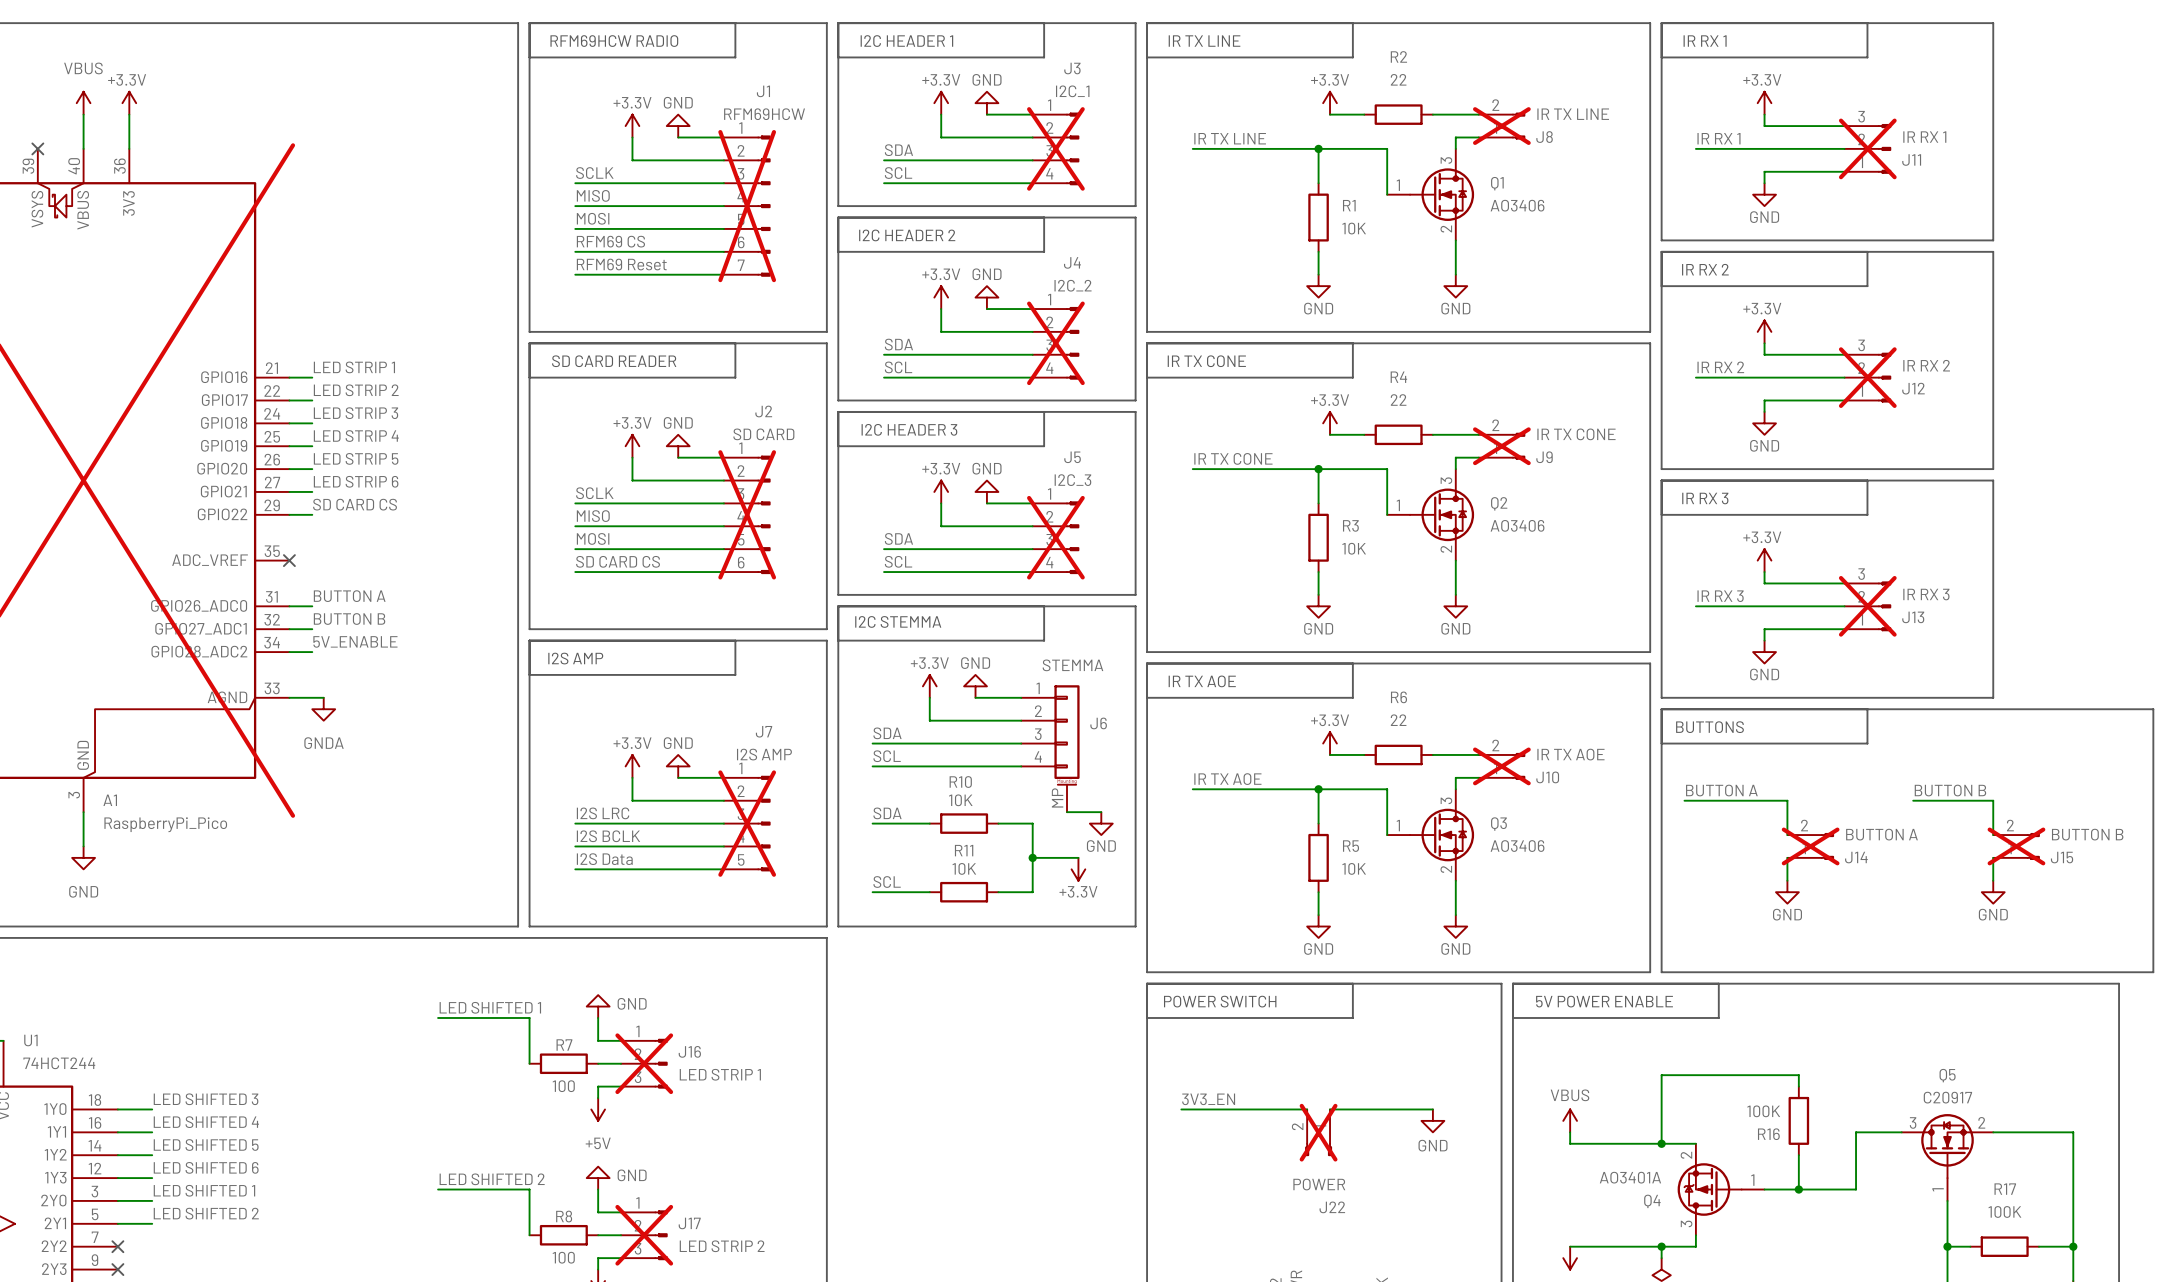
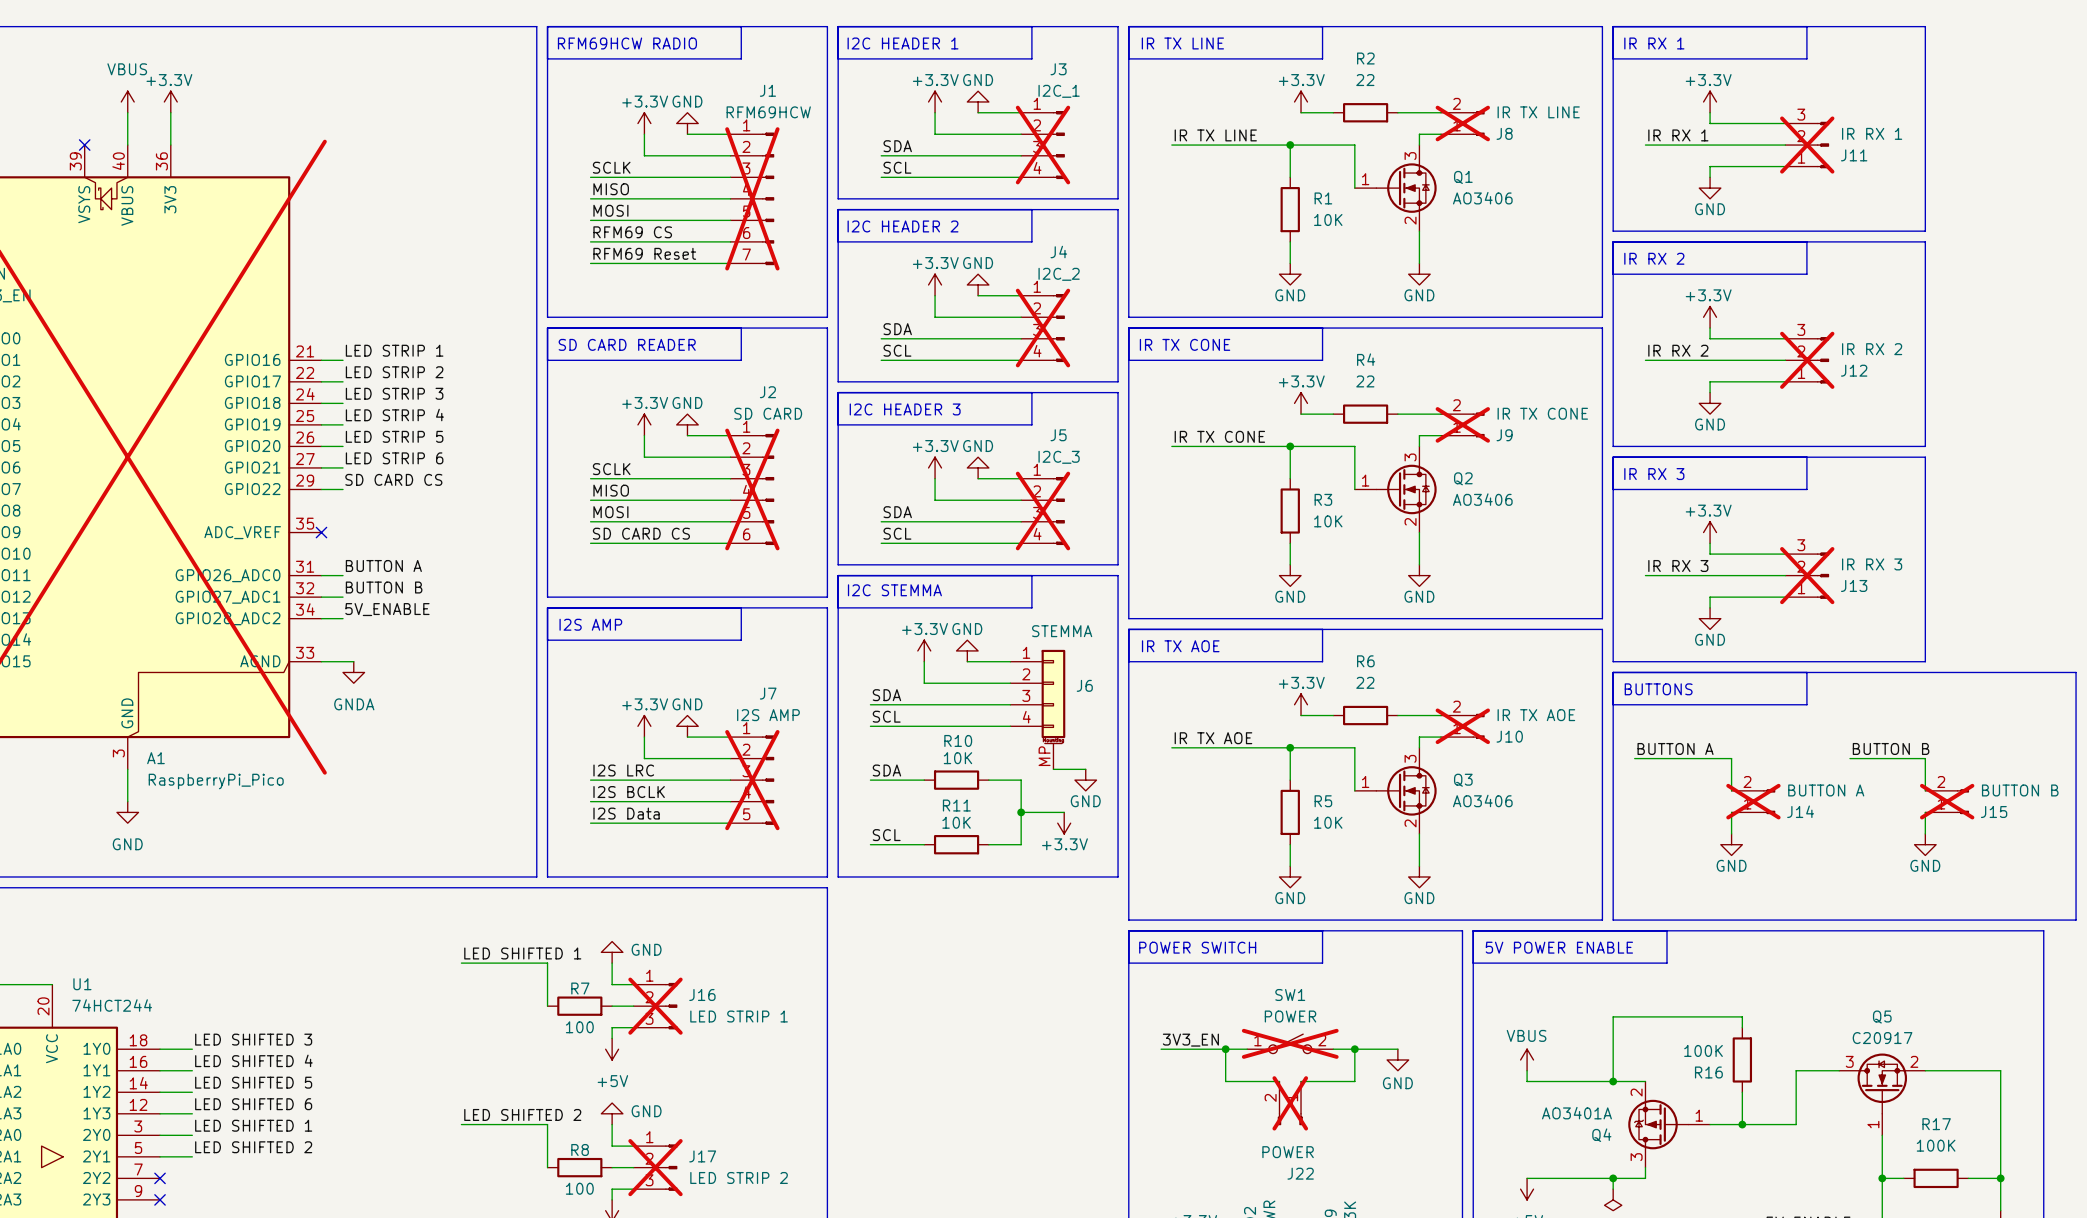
SW1: none -> POWER (1290, 1043)
wire: none -> (1225, 1049) (1225, 1081) (1279, 1081)
junction: none -> (1225, 1049)
wire: none -> (1354, 1049) (1354, 1081) (1301, 1081)
junction: none -> (1354, 1049)
J22 position: (1318, 1132) -> (1290, 1103)

